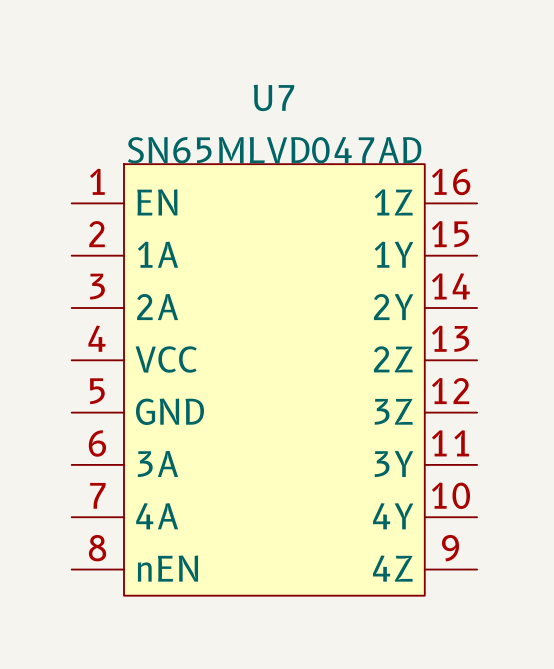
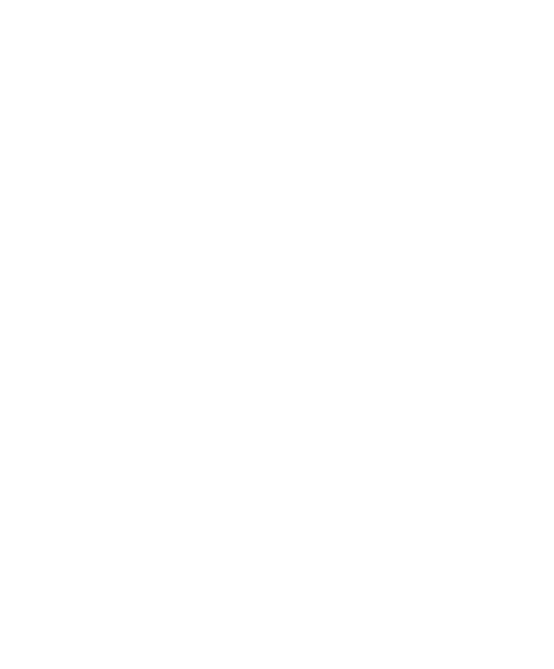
U7: SN65MLVD047AD (274, 379) -> none

